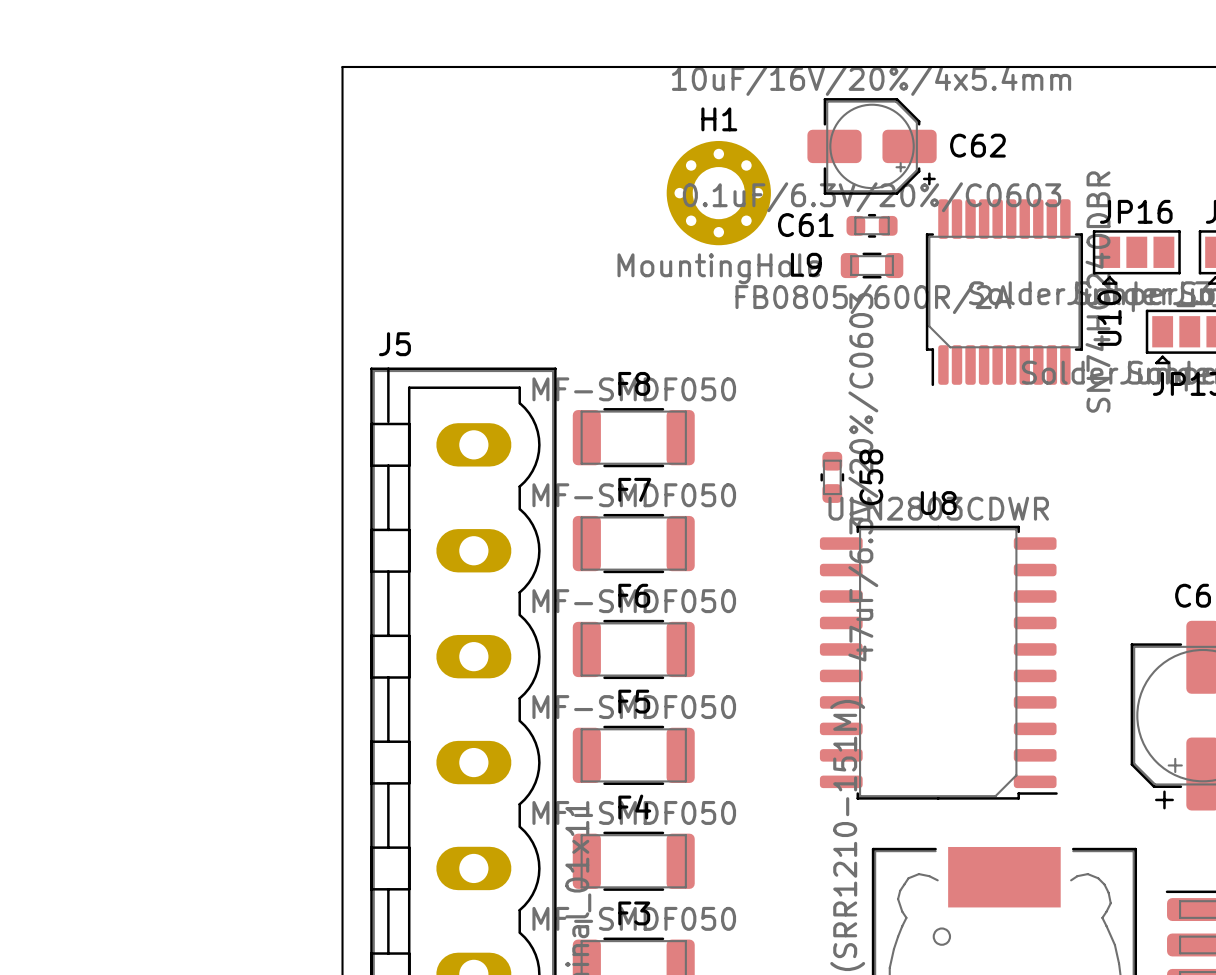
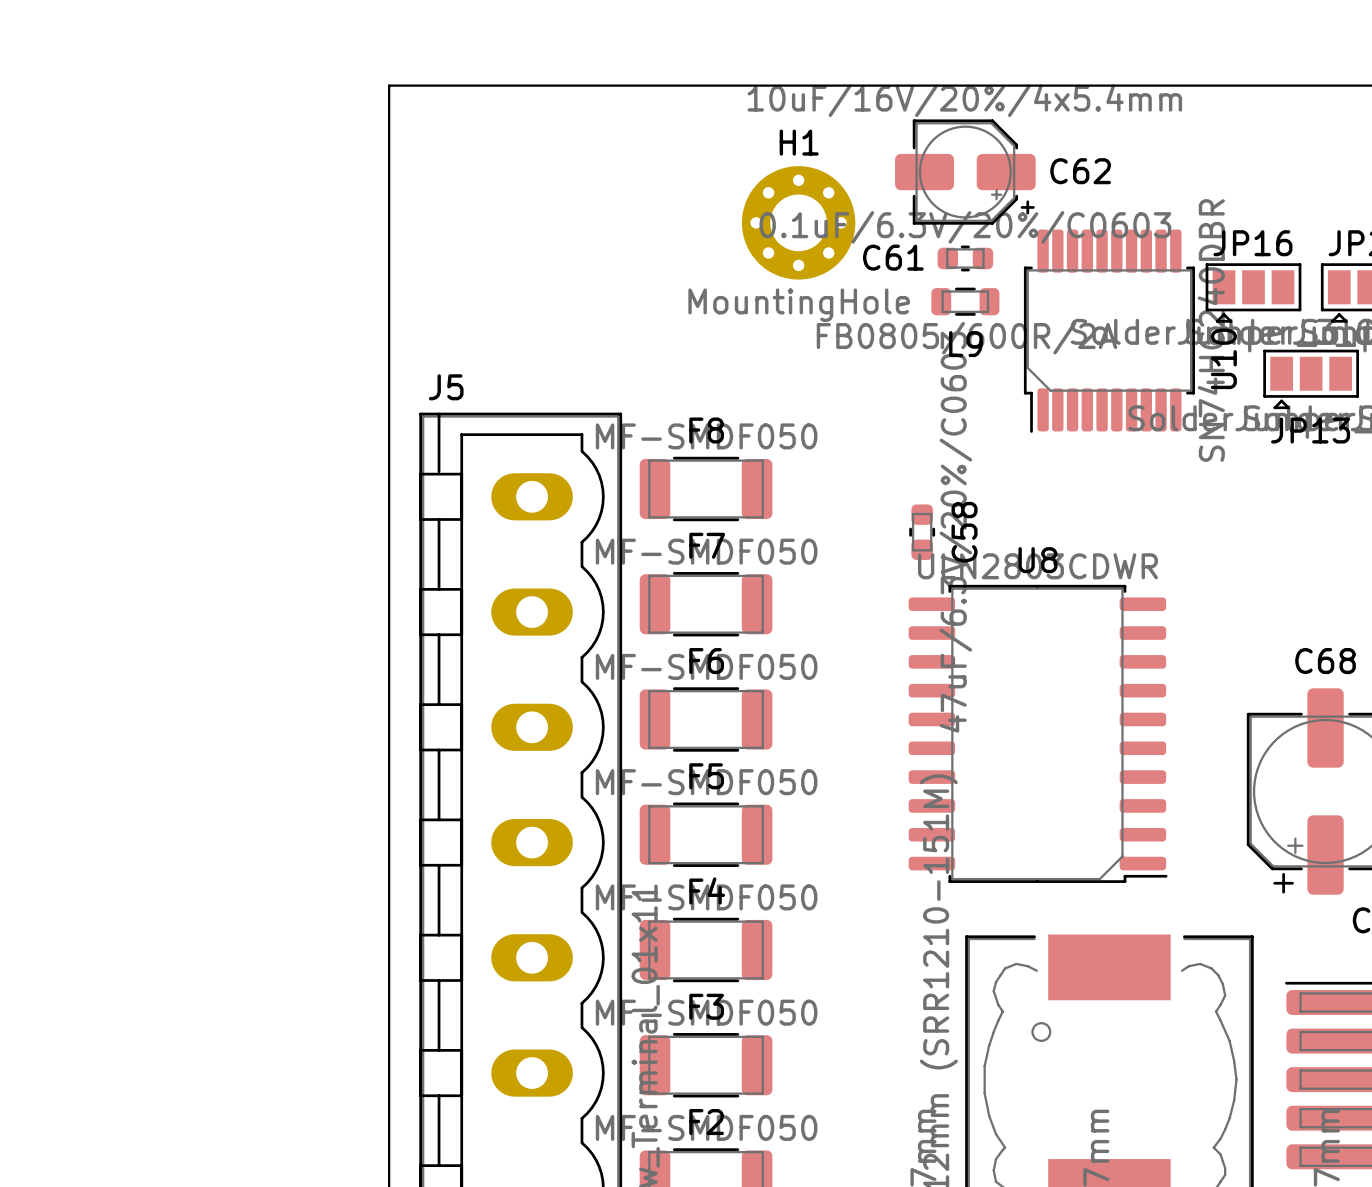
L9 name position: L9 (806, 264) -> L9 (965, 344)

